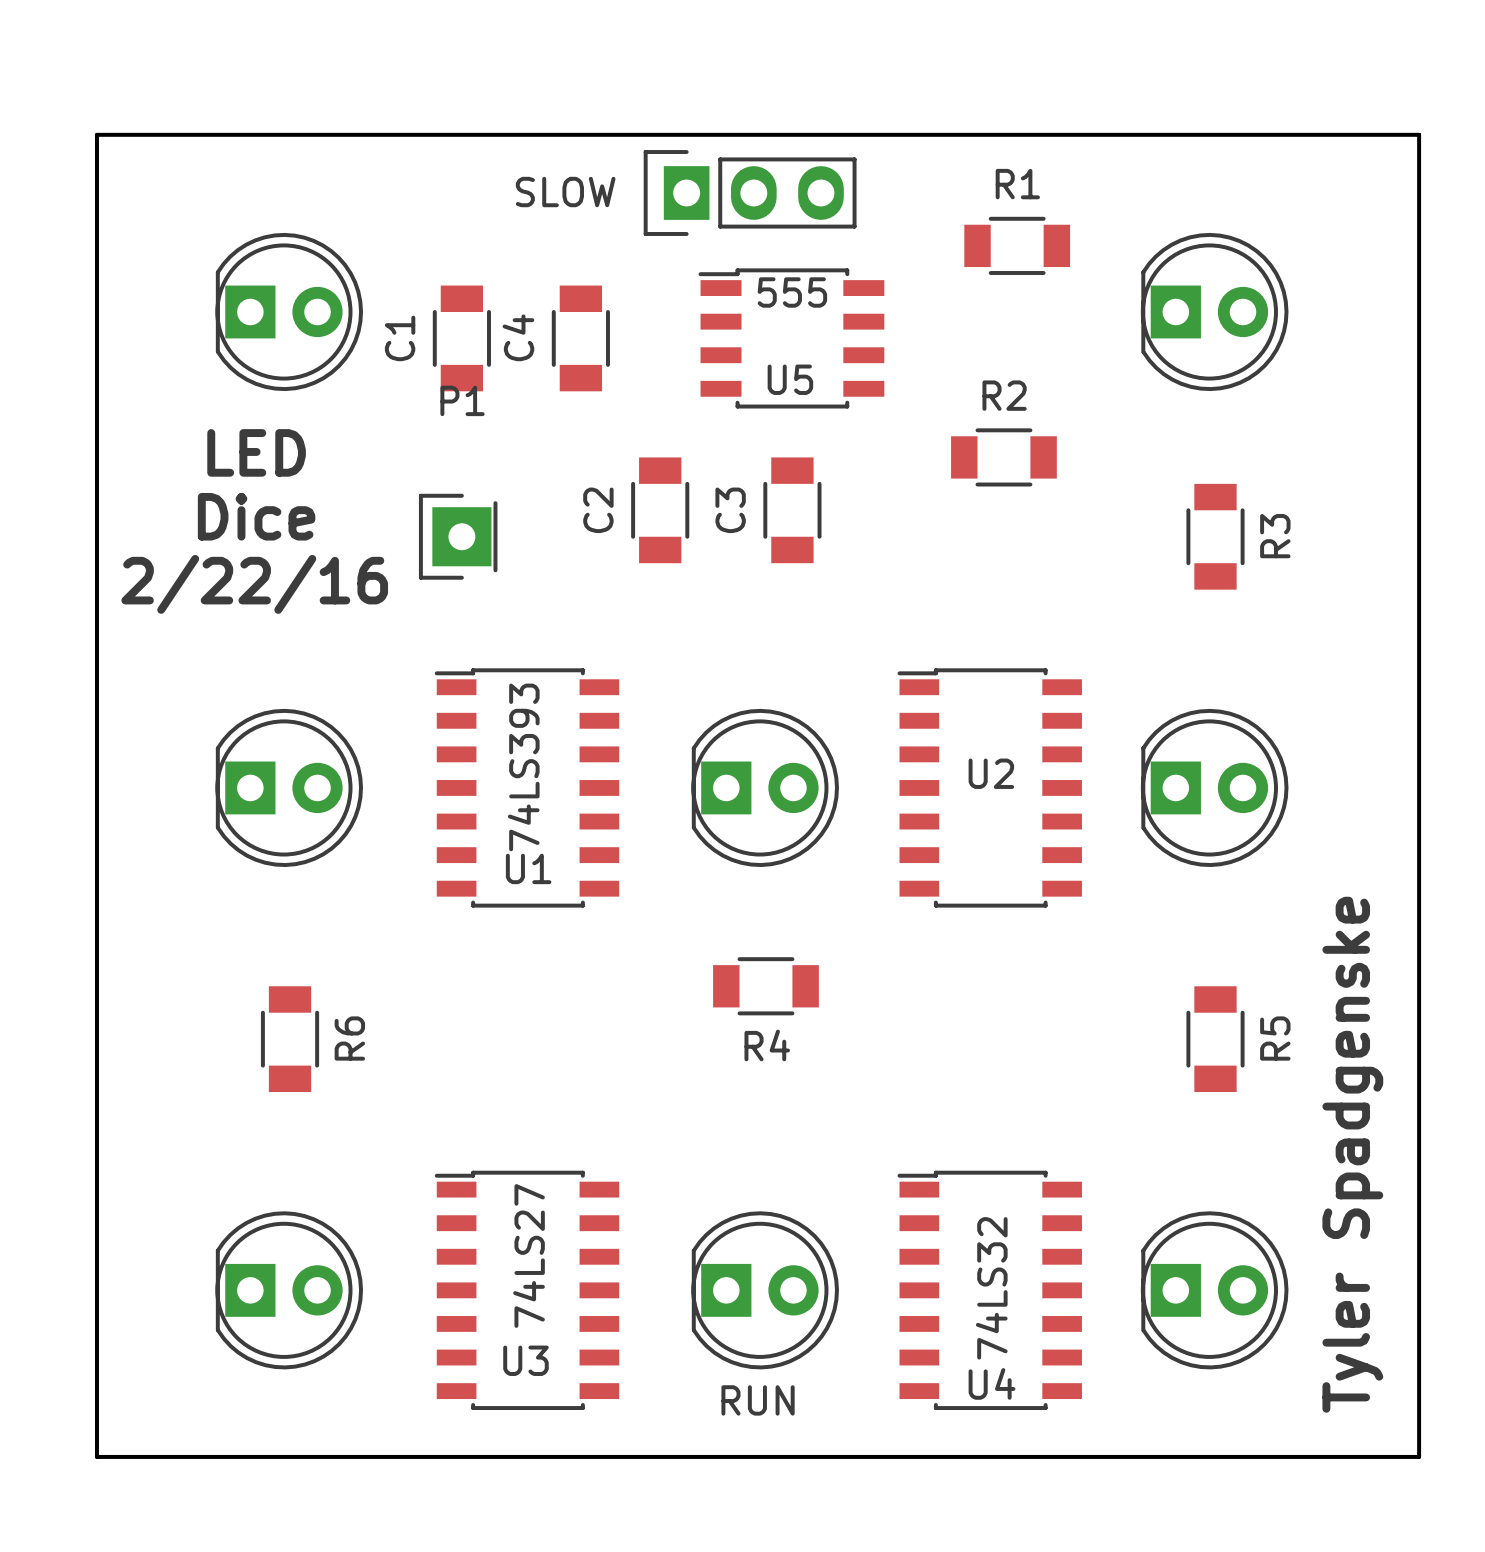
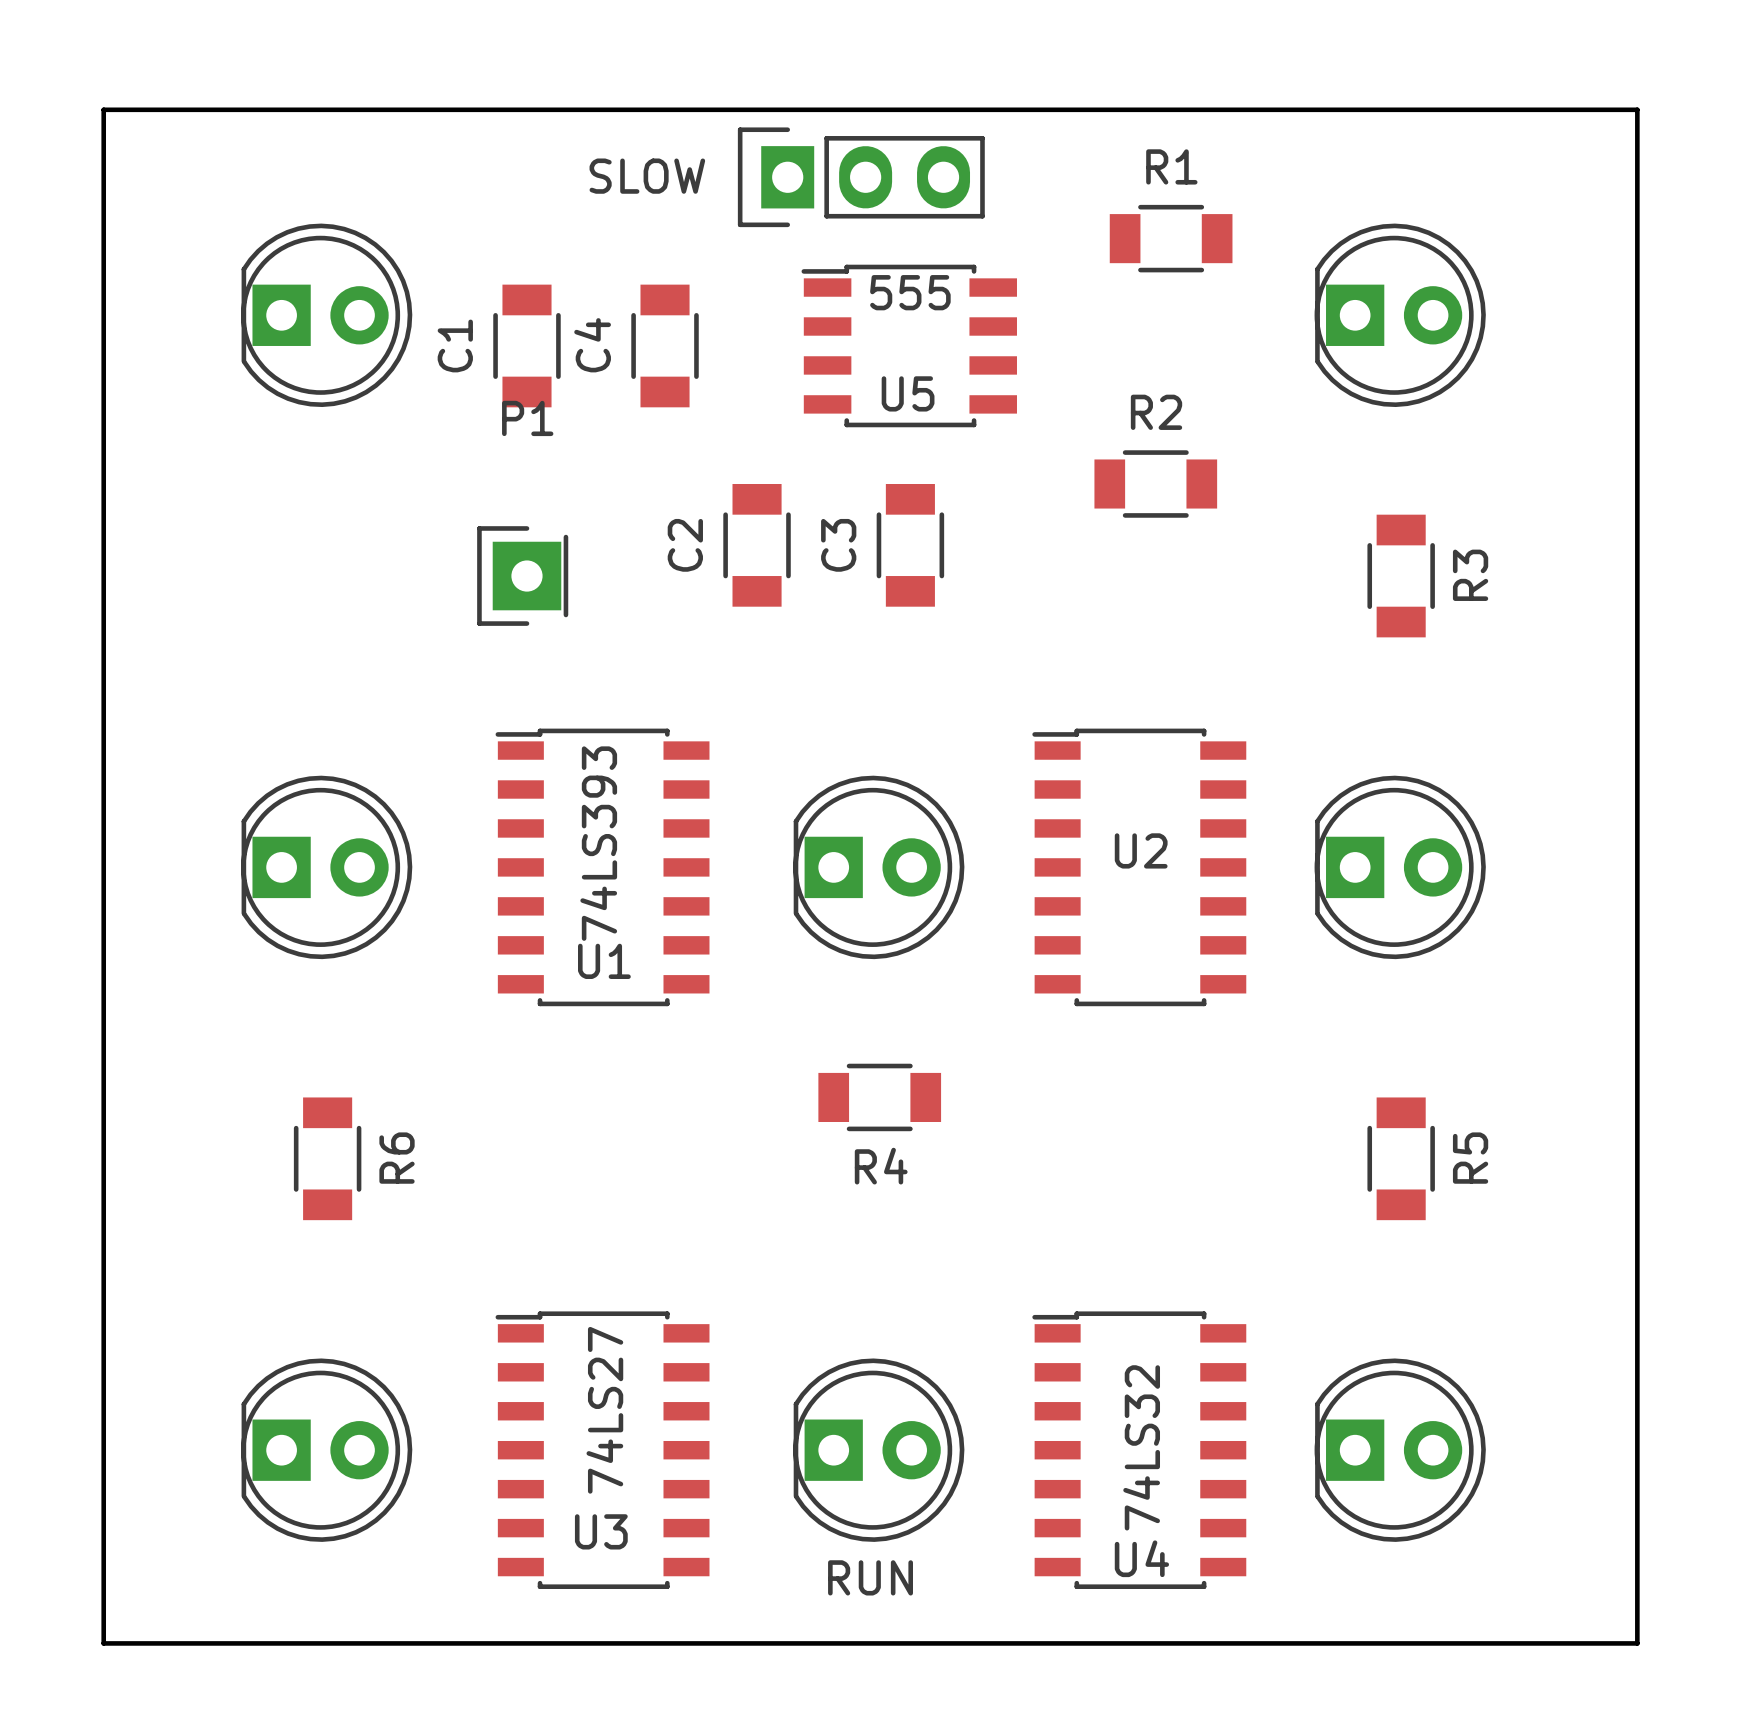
text: LED (256, 452) -> none
text: Dice (256, 516) -> none
text: 2/22/16 (254, 584) -> none
text: Tyler Spadgenske (1352, 1154) -> none

